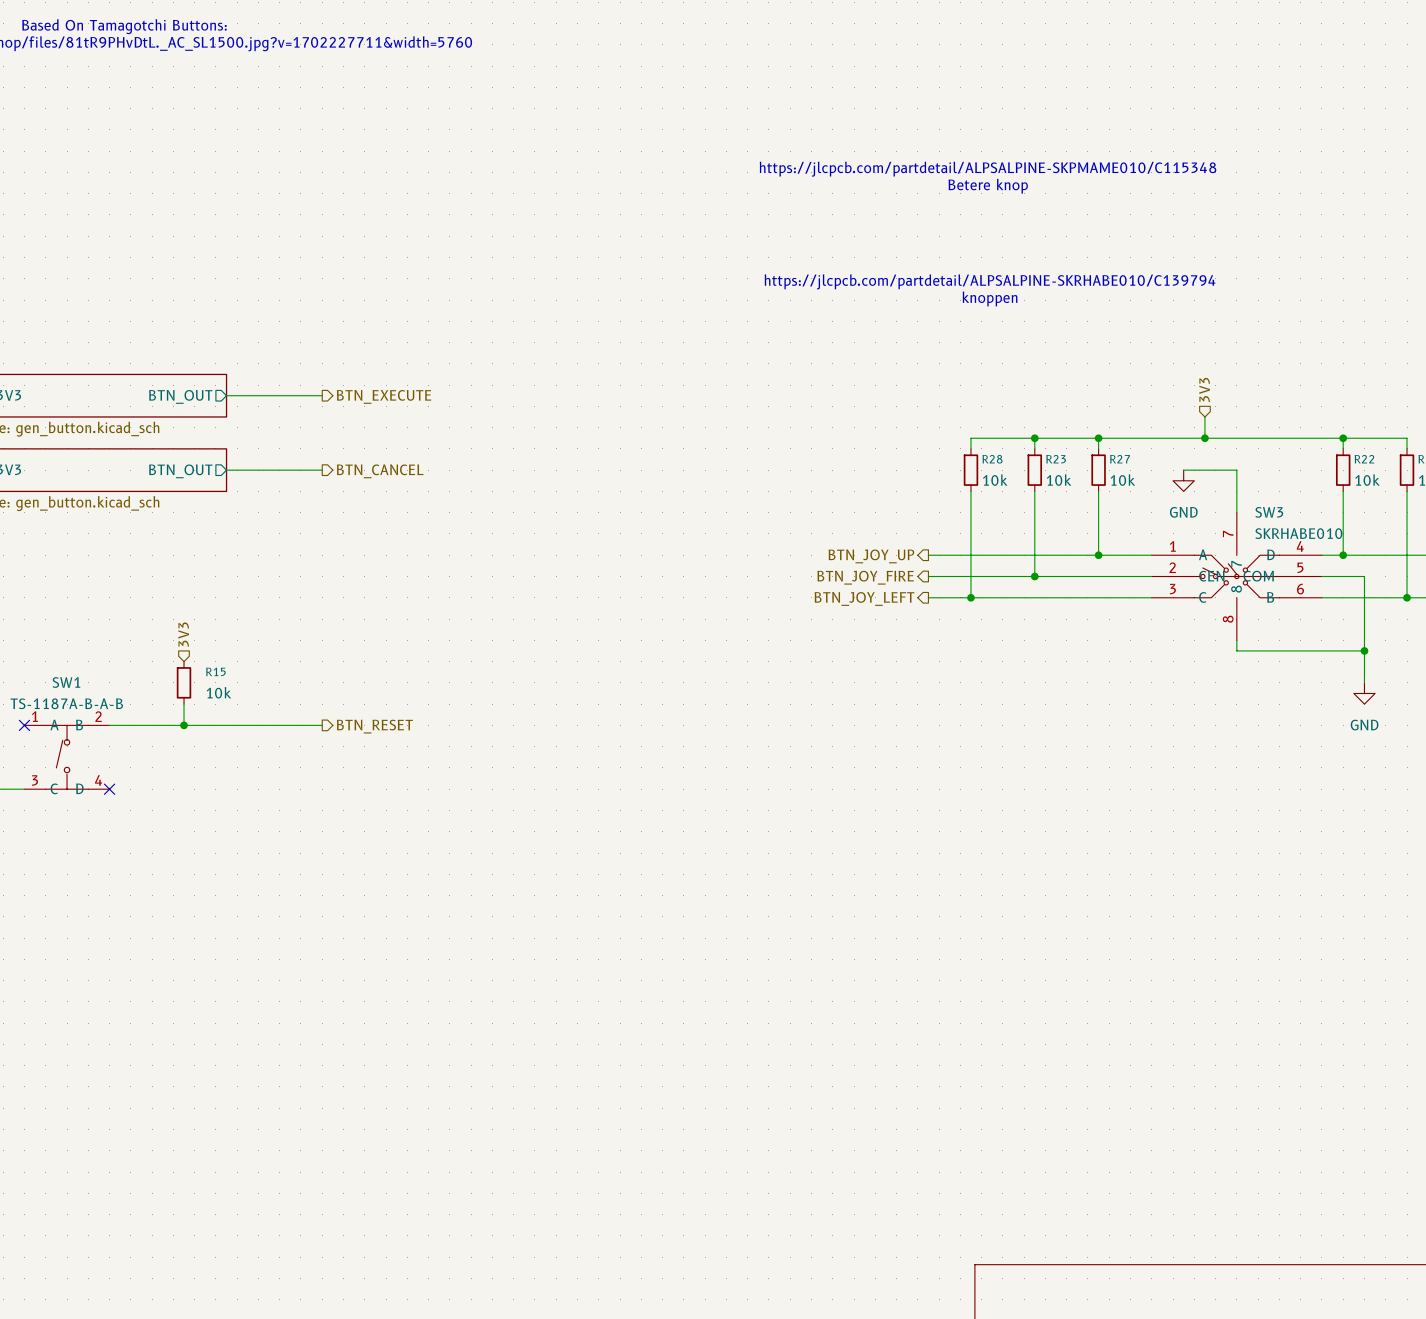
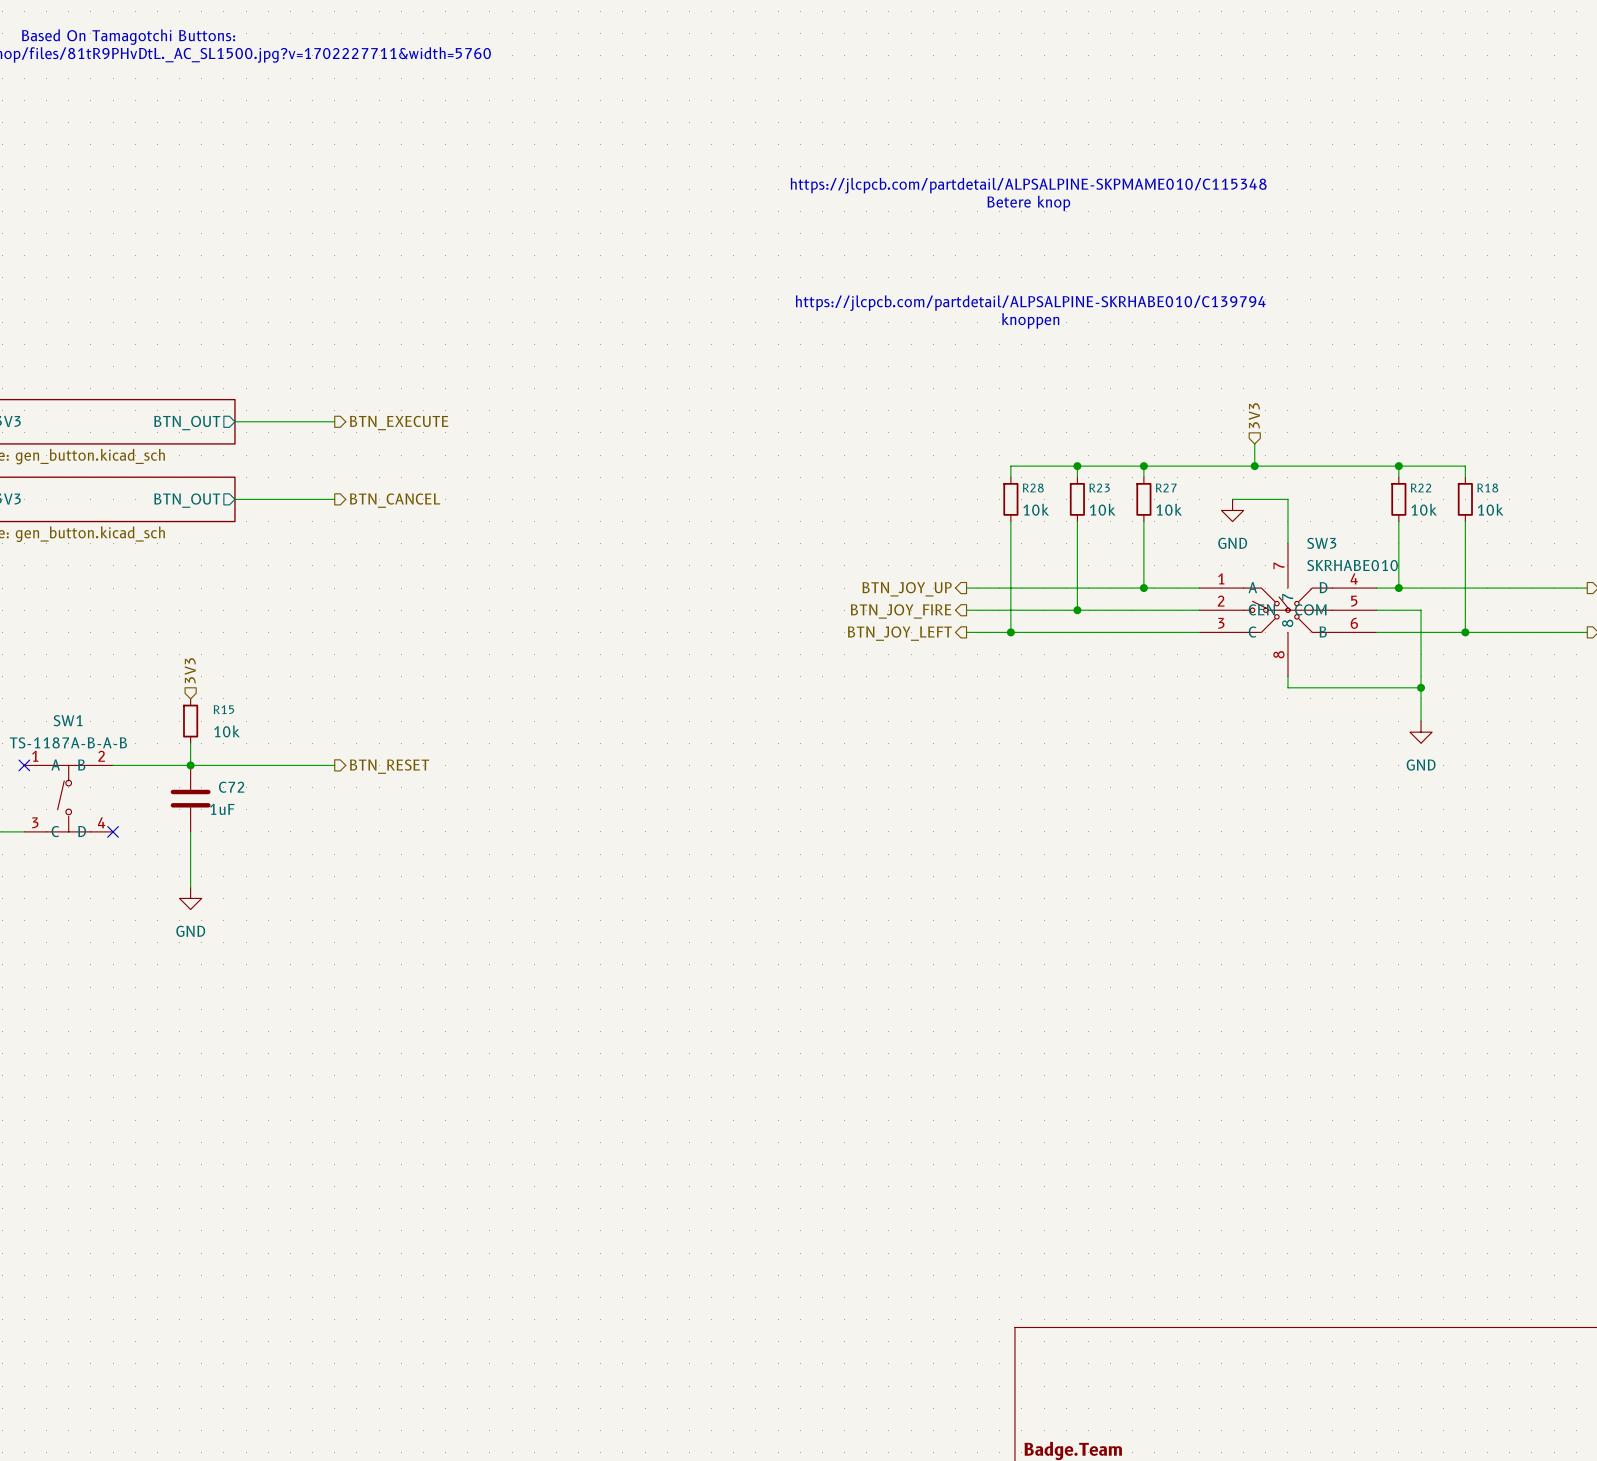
C72: none -> 1uF (190, 798)
wire: none -> (190, 831) (190, 887)
power symbol: none -> GND (190, 898)

